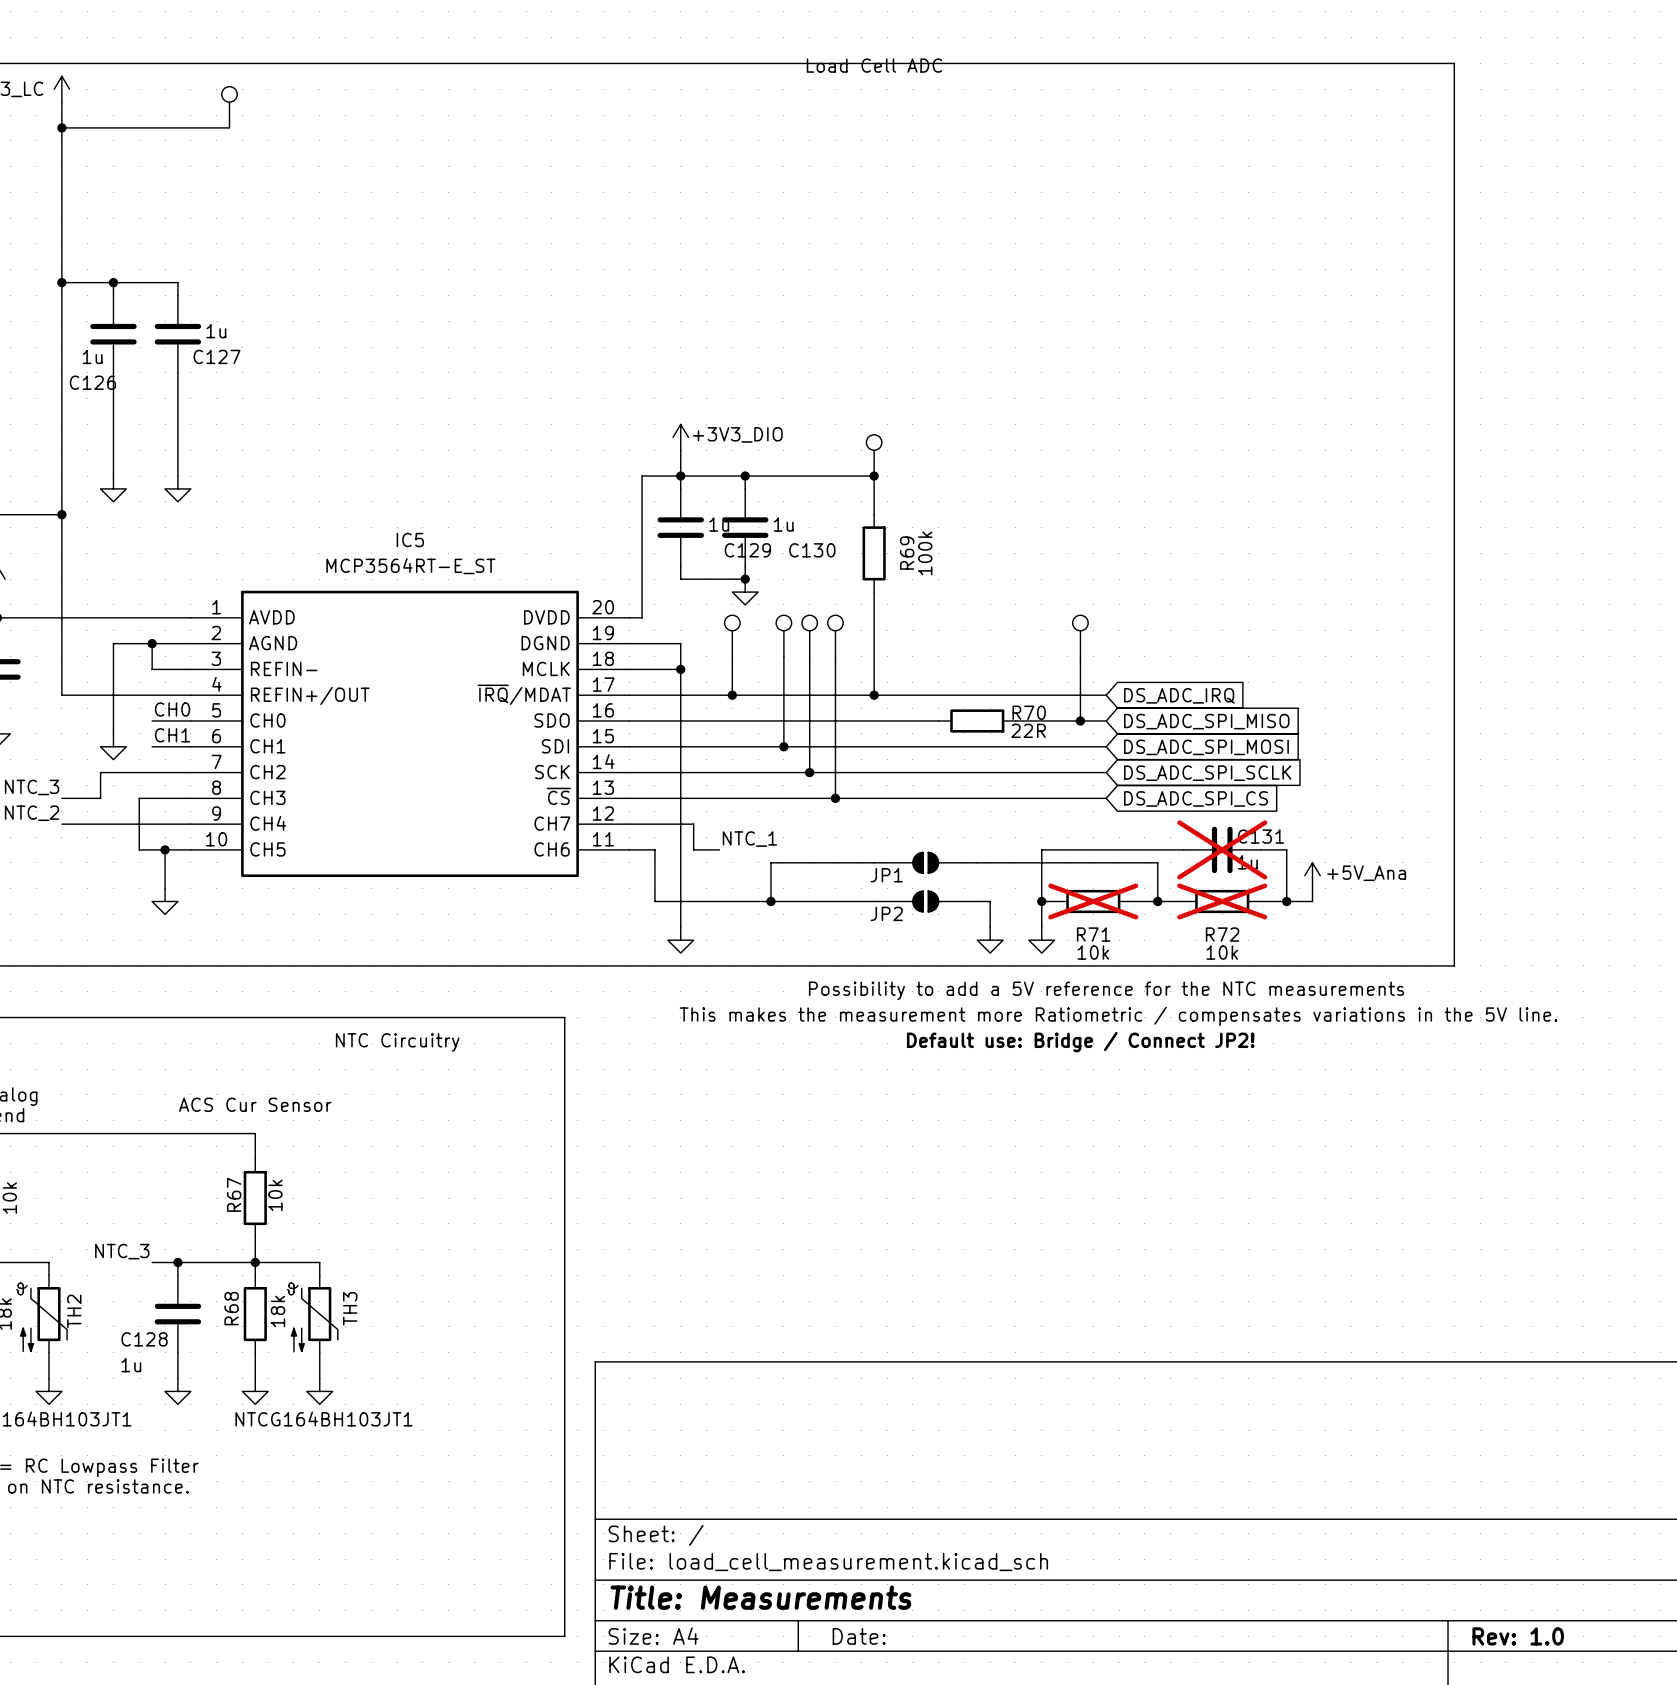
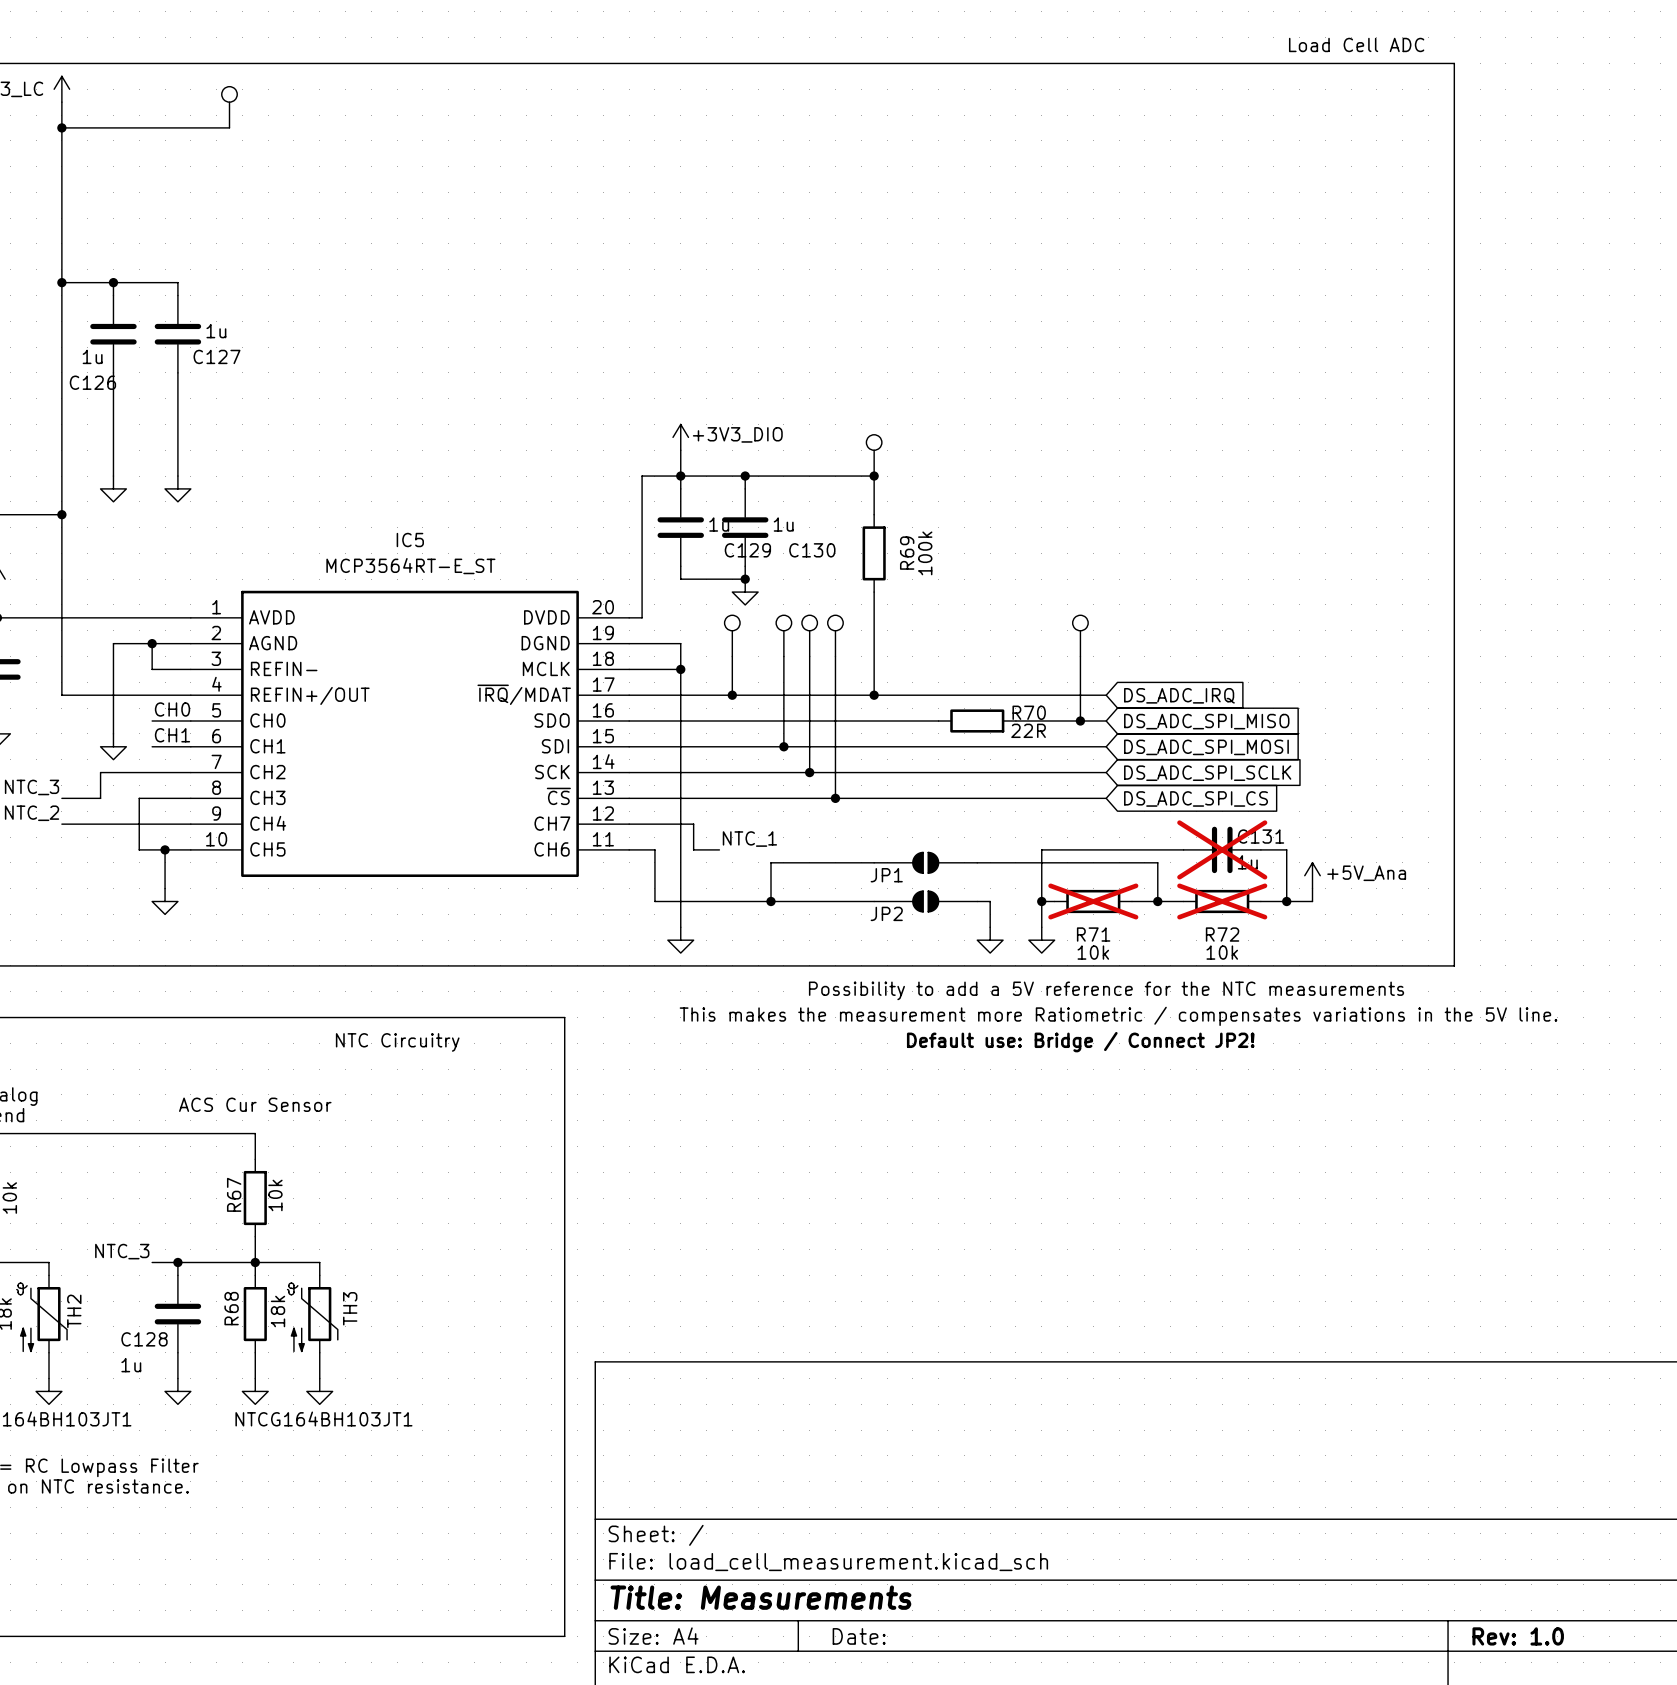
text: none -> Load Cell ADC (1356, 44)
text: Load Cell ADC (874, 65) -> none

